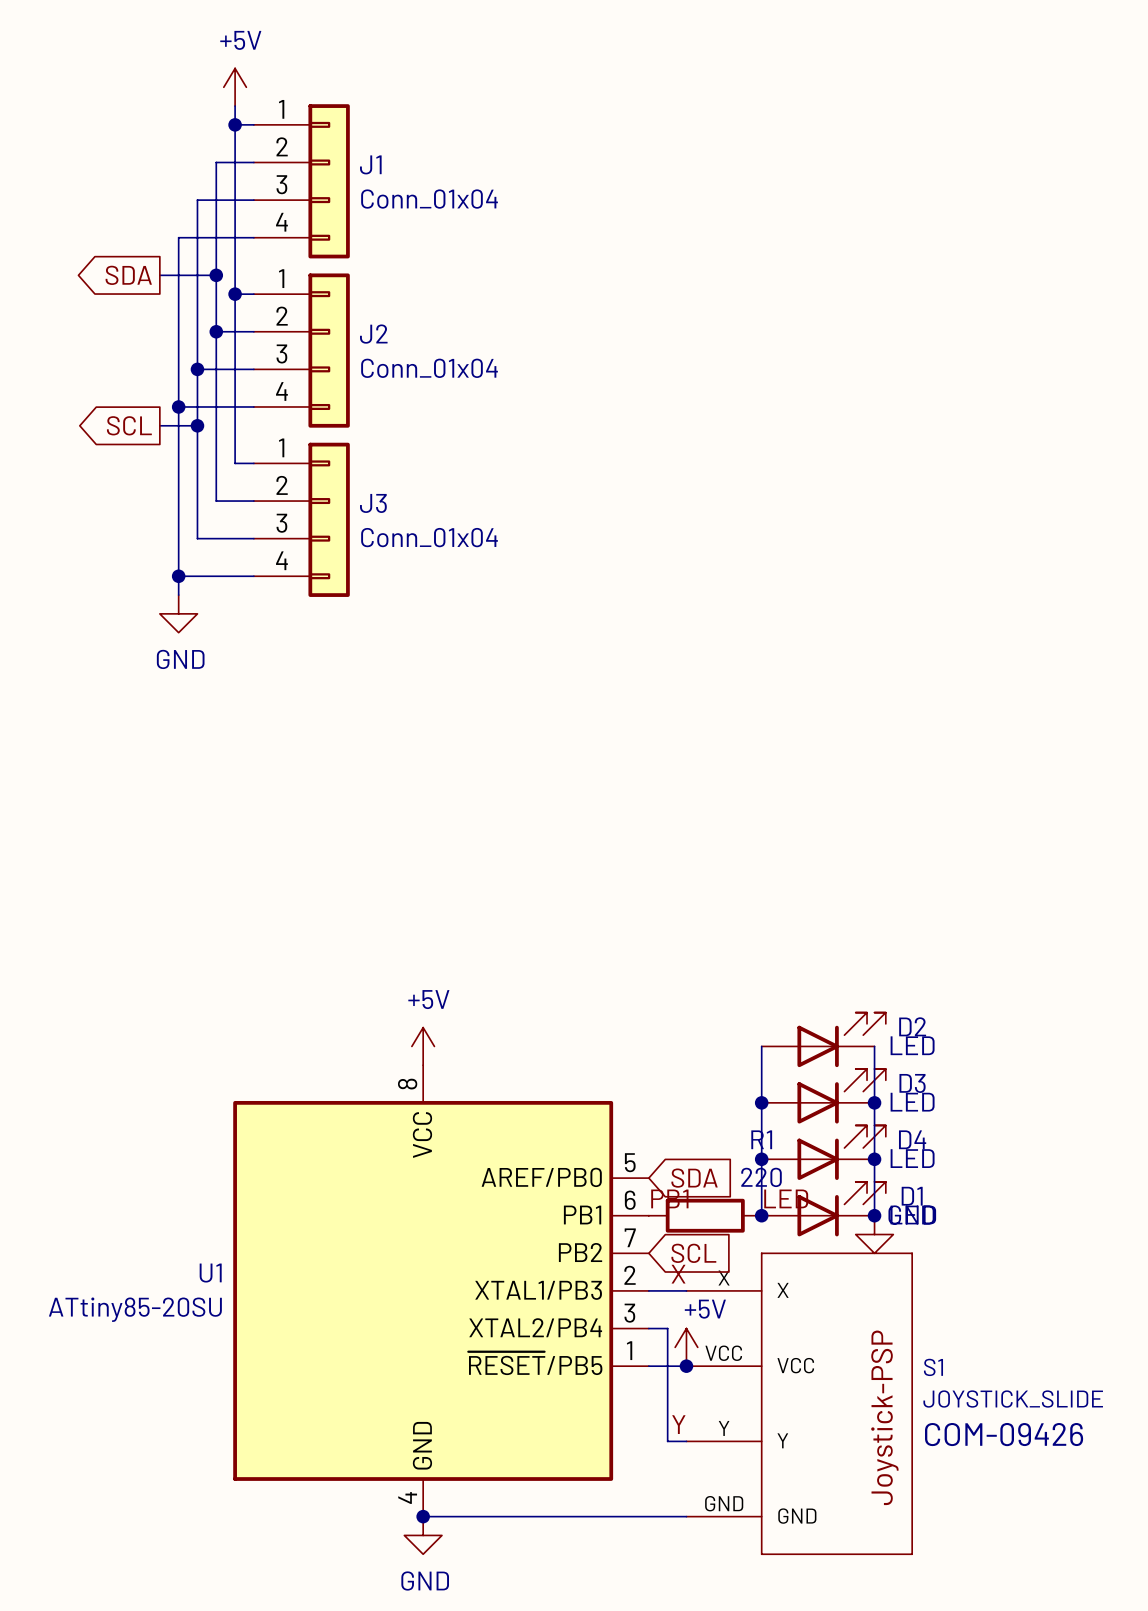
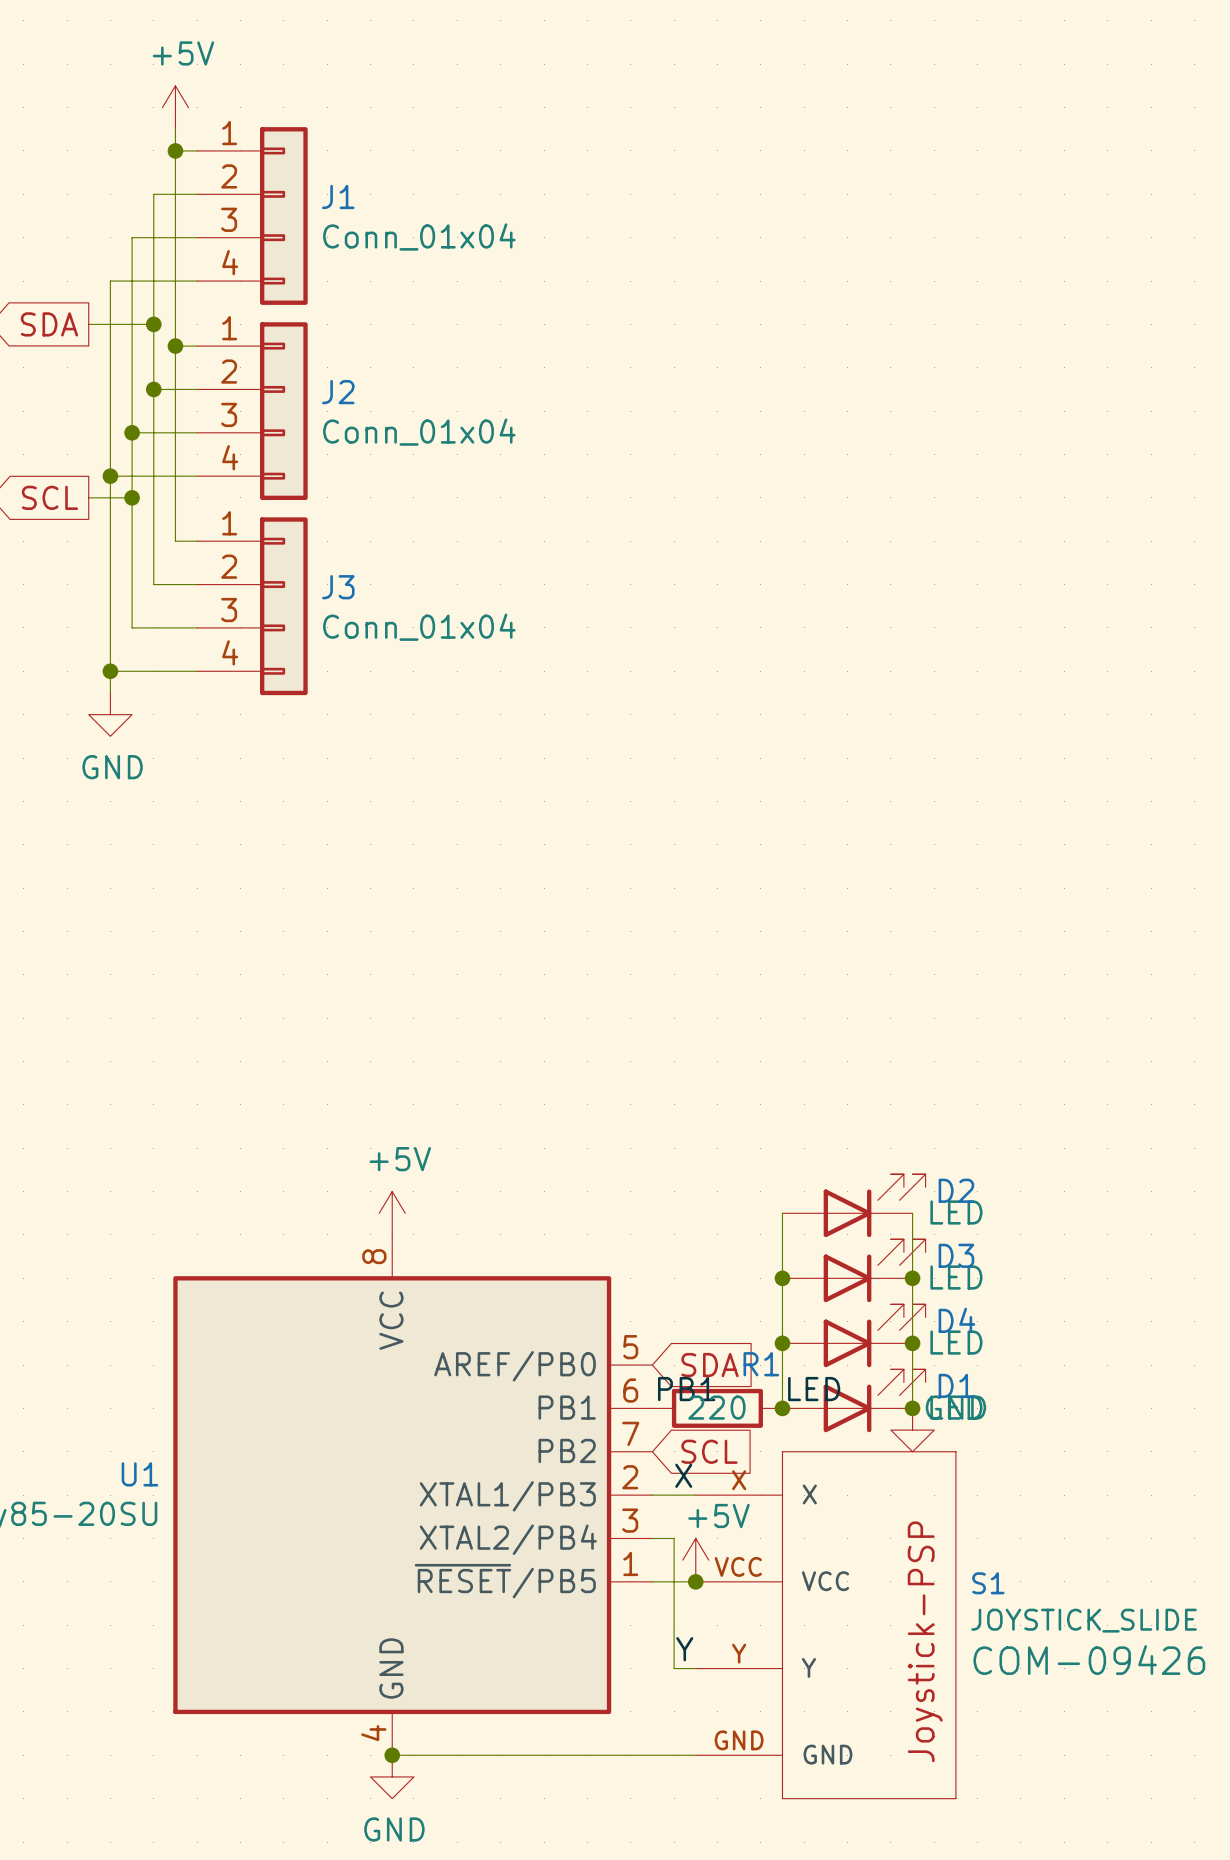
R1 name position: R1 (761, 1139) -> R1 (761, 1364)
R1 value position: 220 (761, 1177) -> 220 (716, 1407)

